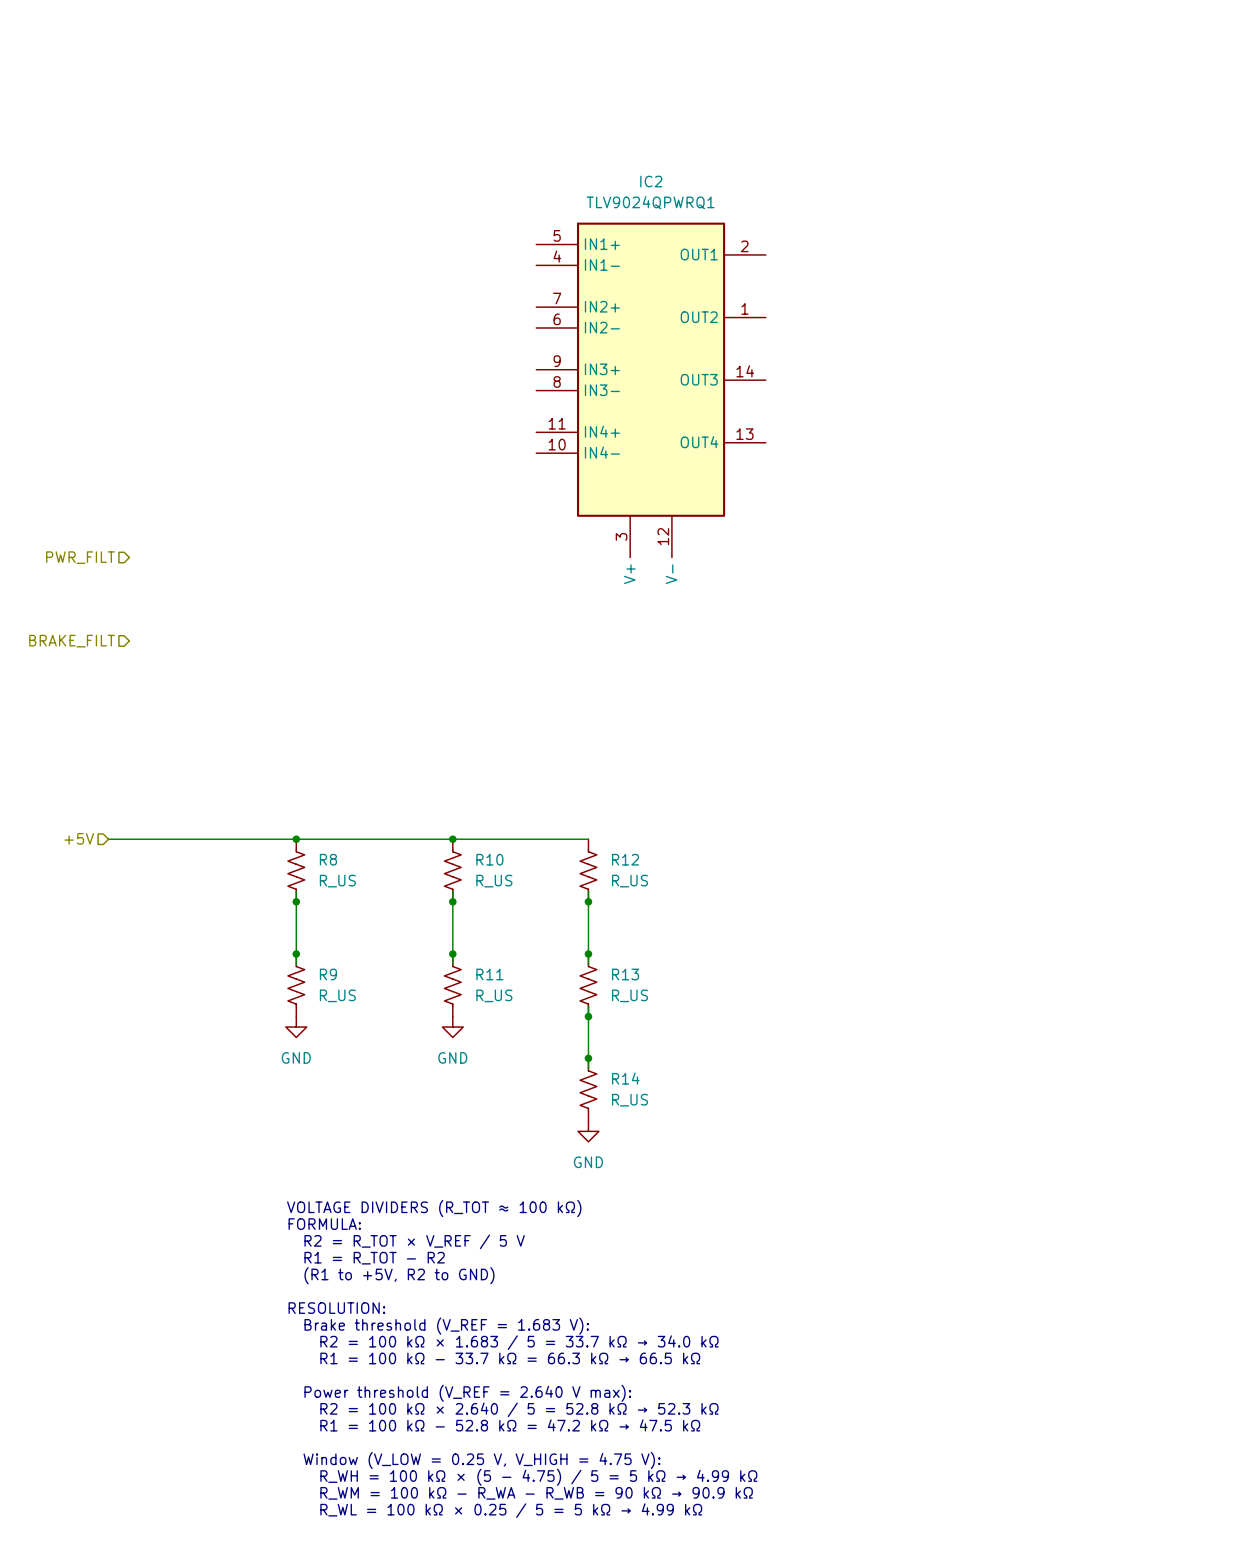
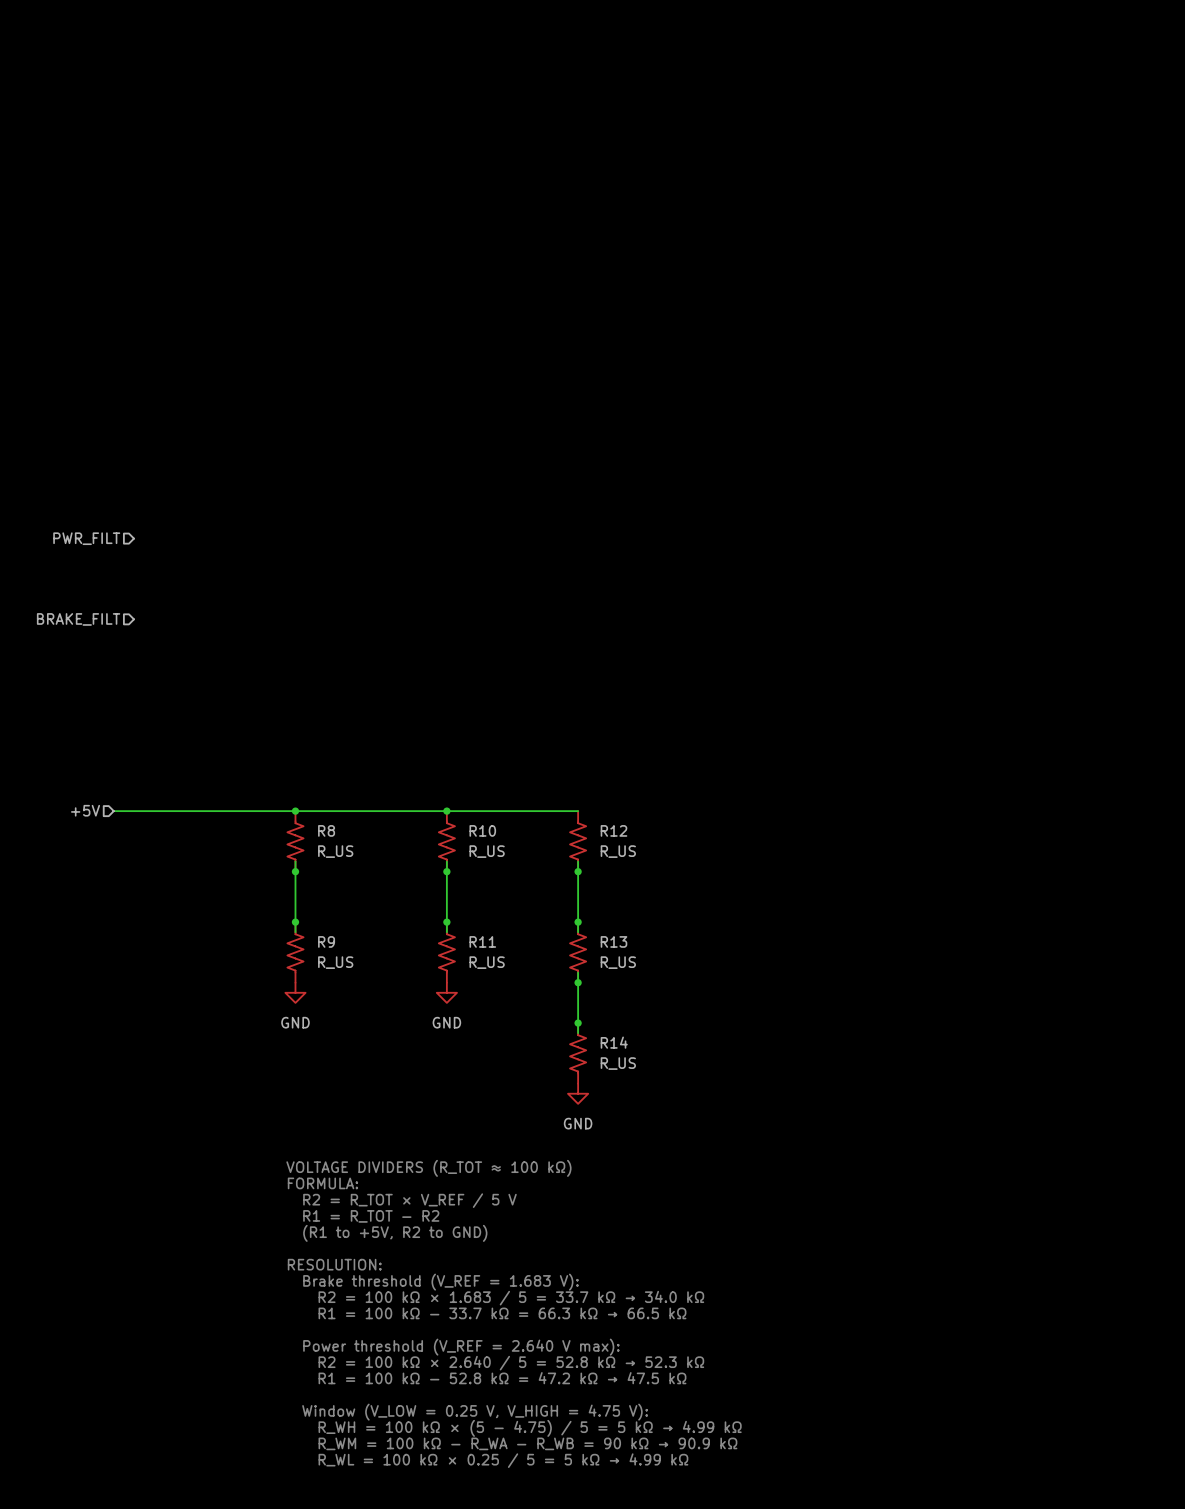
IC2: TLV9024QPWRQ1 (651, 390) -> none

